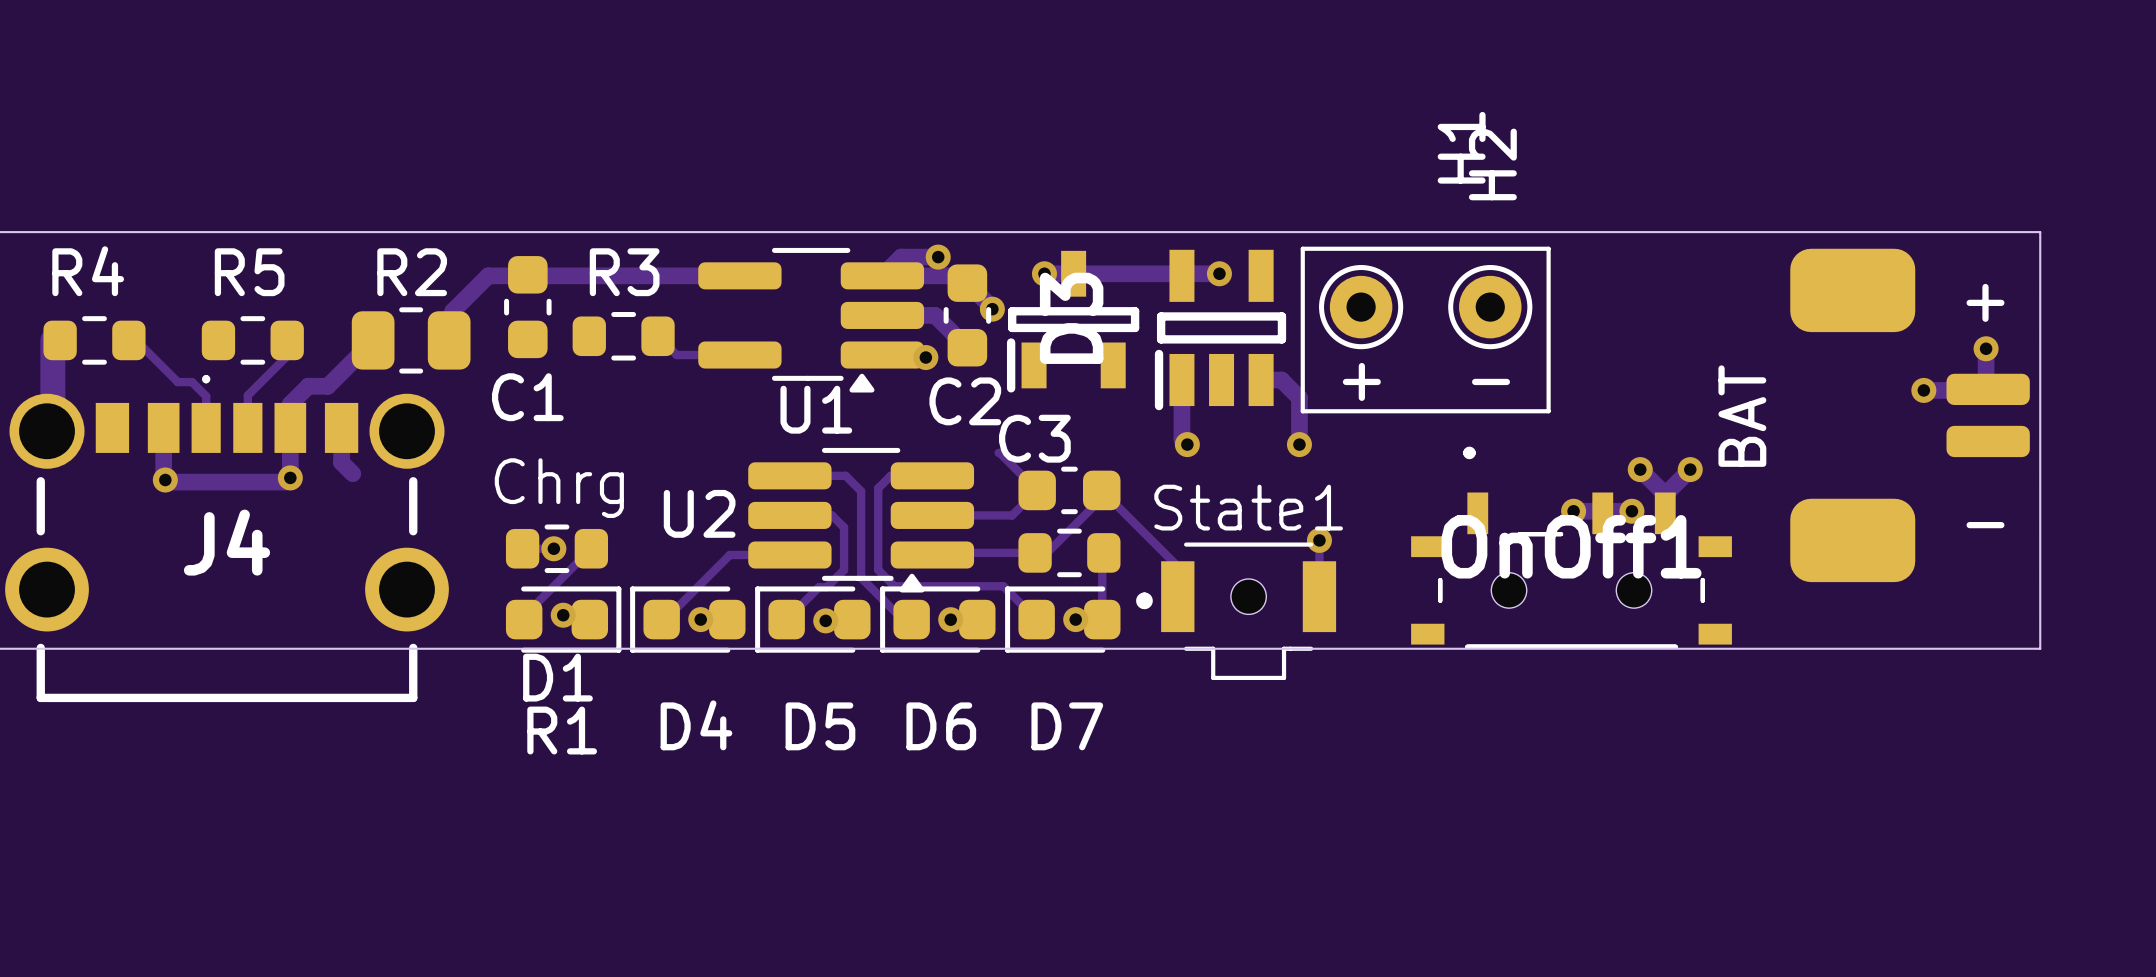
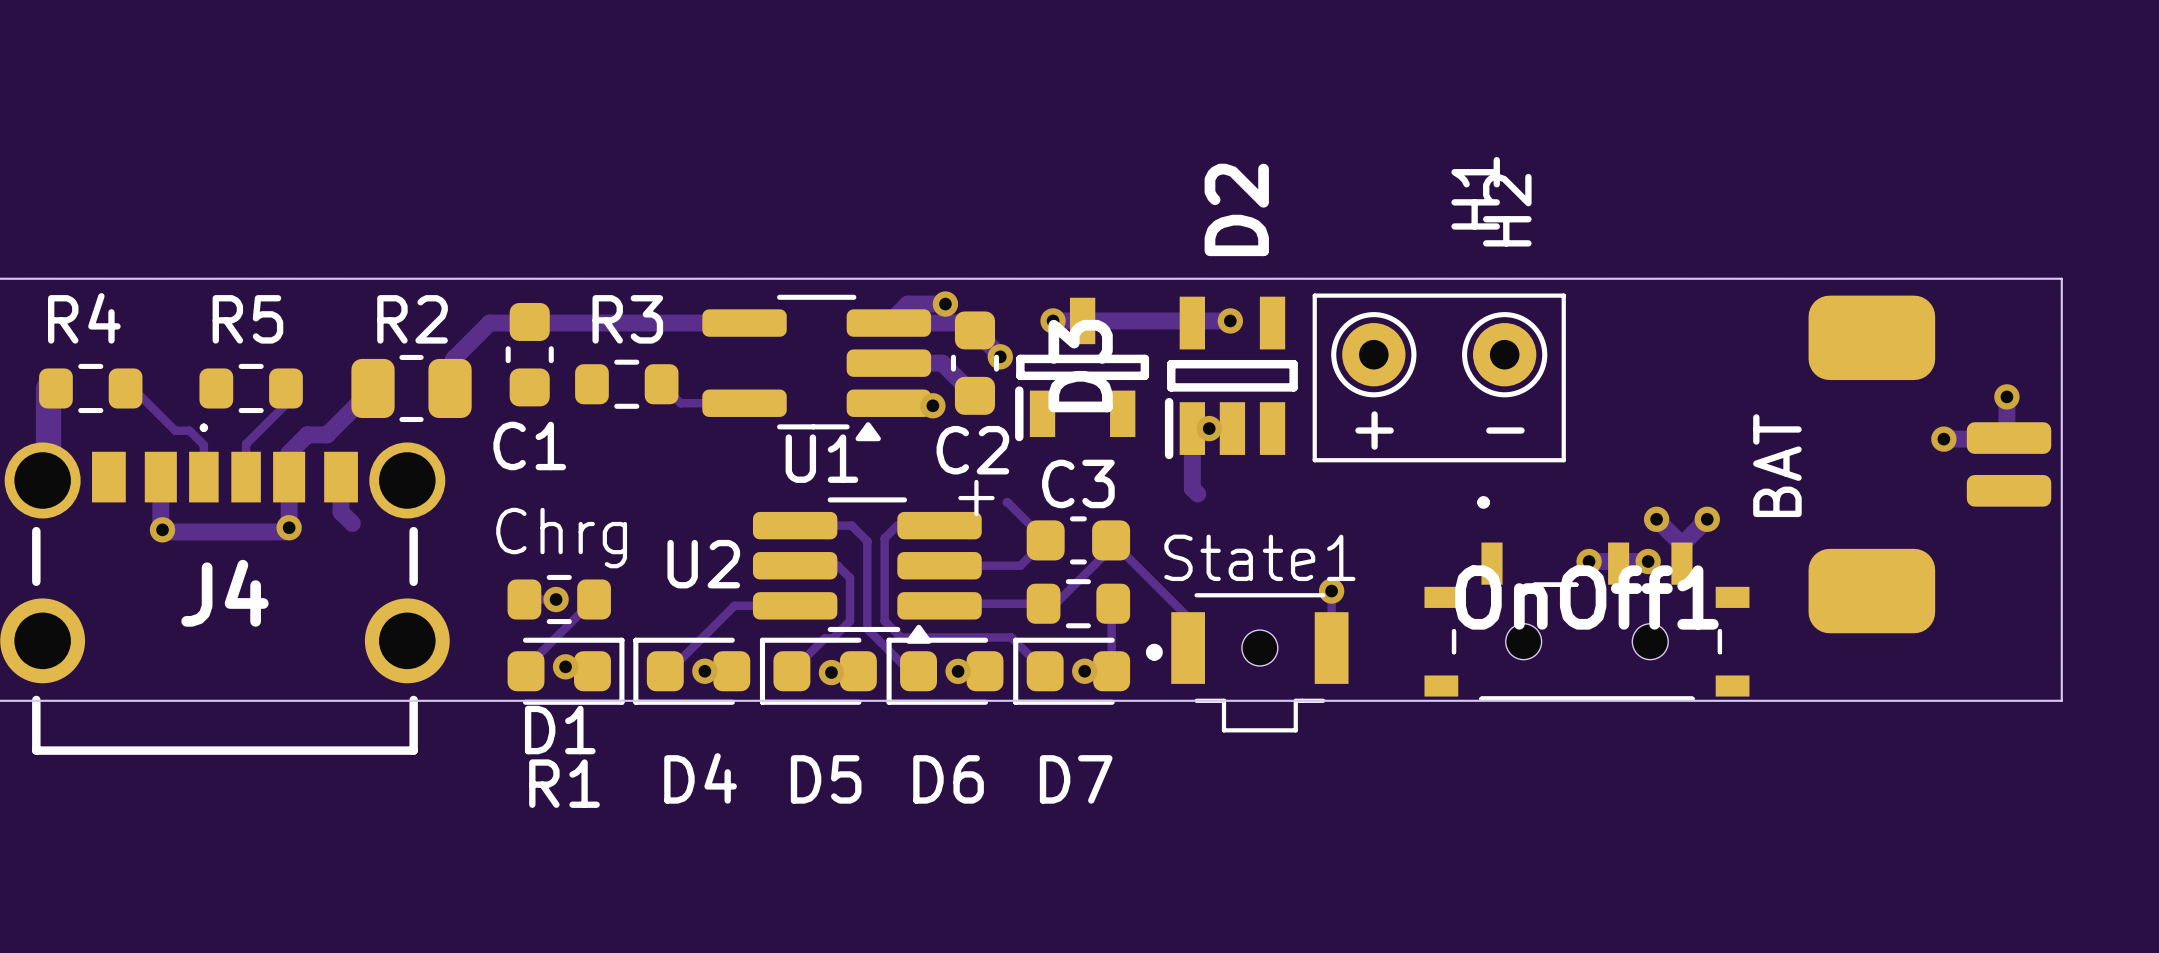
D2 name: none -> D2 (1236, 209)
text position: + (1985, 302) -> + (976, 498)
via: none -> (1209, 428)
track: (1261, 380) (1281, 380) (1299, 397) (1299, 444) -> none
part value position: BAT (1742, 416) -> BAT (1777, 465)
C3 name position: C3 (1034, 438) -> C3 (1078, 483)
via: (1187, 444) -> none
via: (1299, 444) -> none
text: - (1985, 525) -> none

